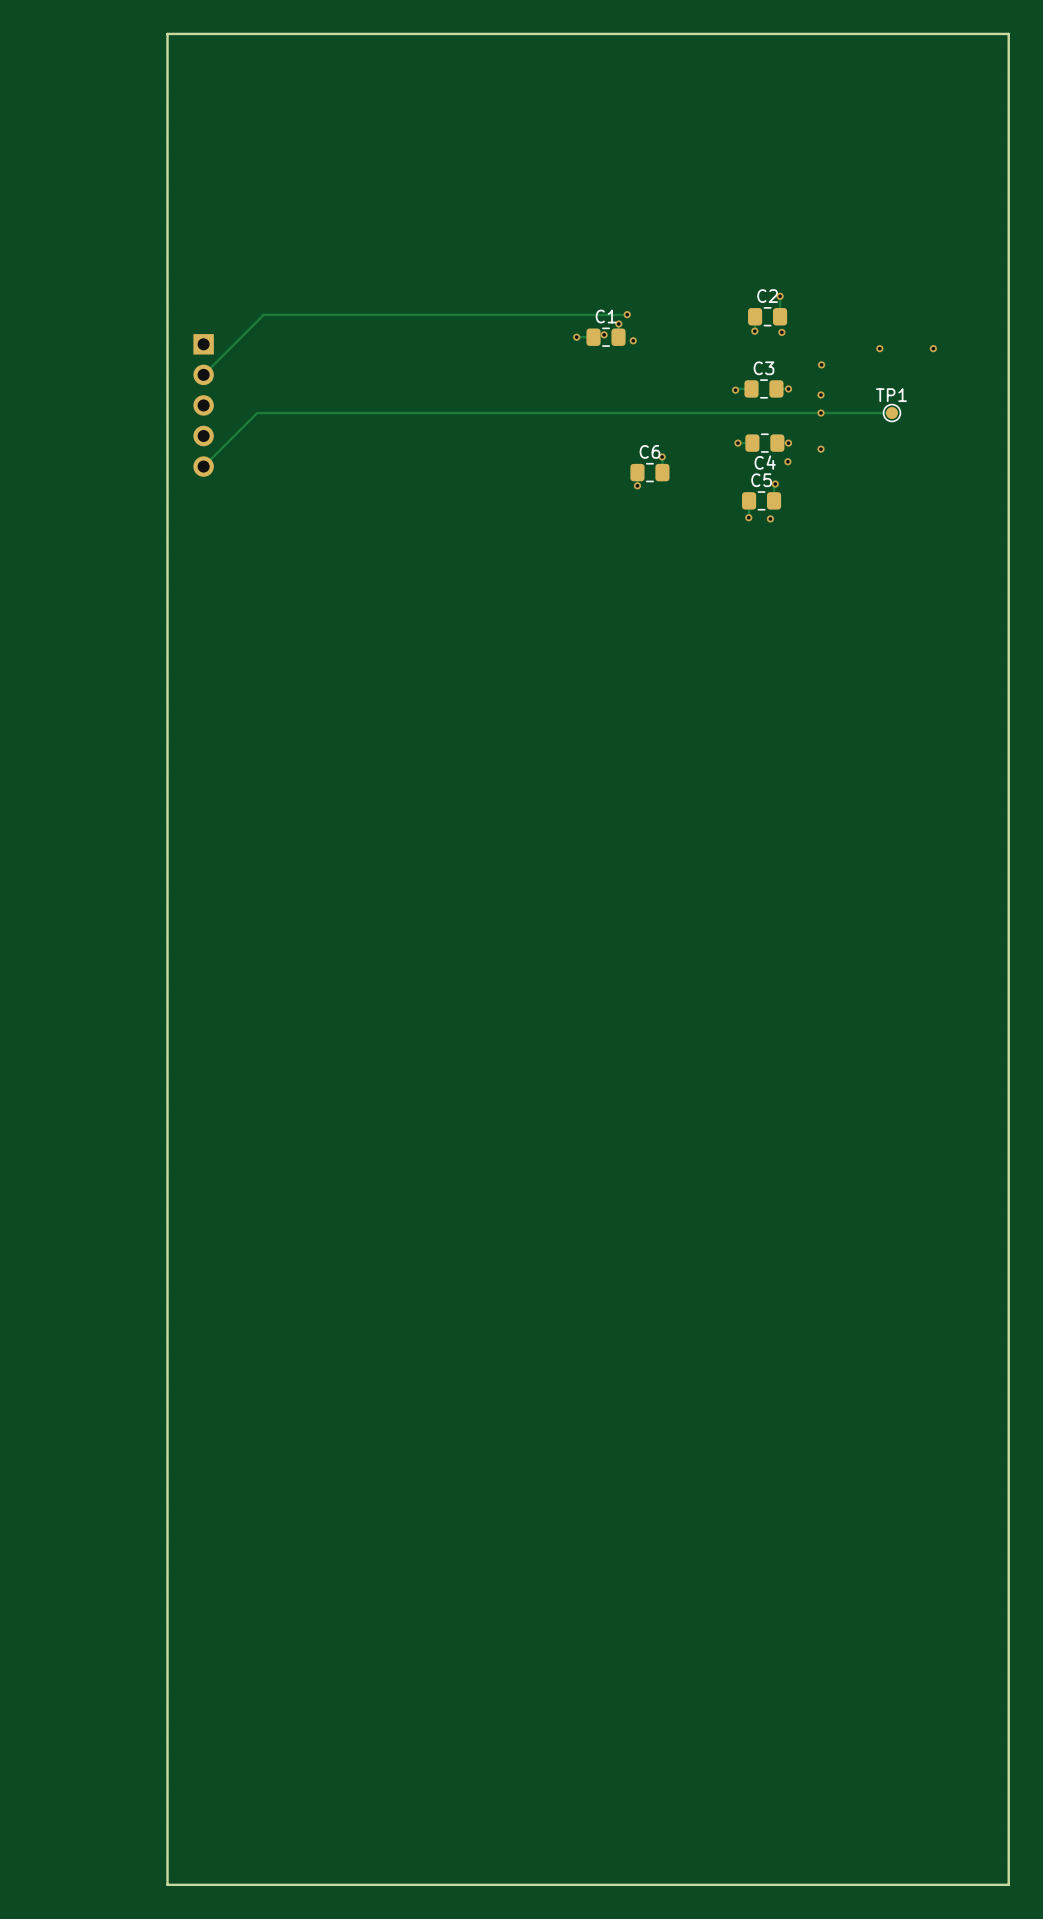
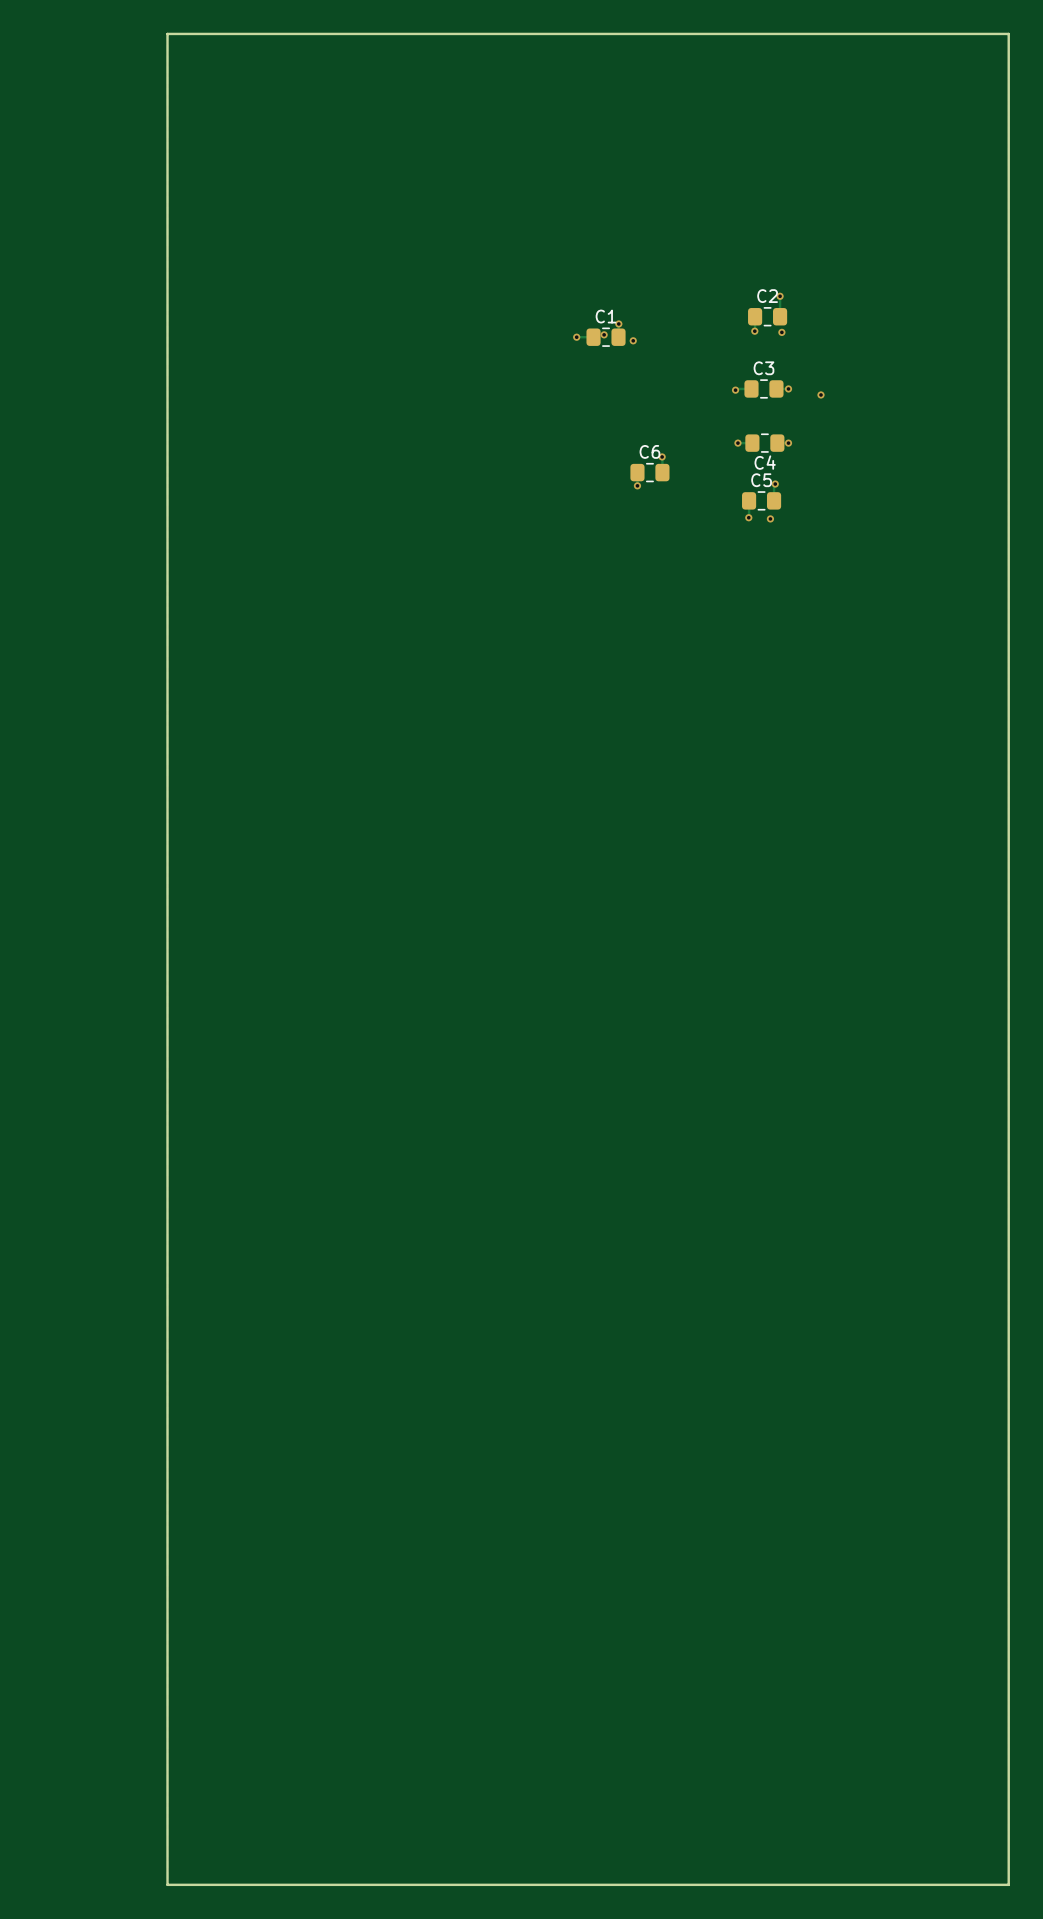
track: (626, 314) (263, 314) (203, 374) -> none
via: (627, 314) -> none
via: (879, 348) -> none
via: (933, 348) -> none
via: (821, 364) -> none
part: (203, 405) -> none
via: (820, 413) -> none
track: (891, 413) (257, 413) (203, 466) -> none
TP1: (891, 413) -> none
via: (820, 449) -> none
via: (787, 461) -> none

